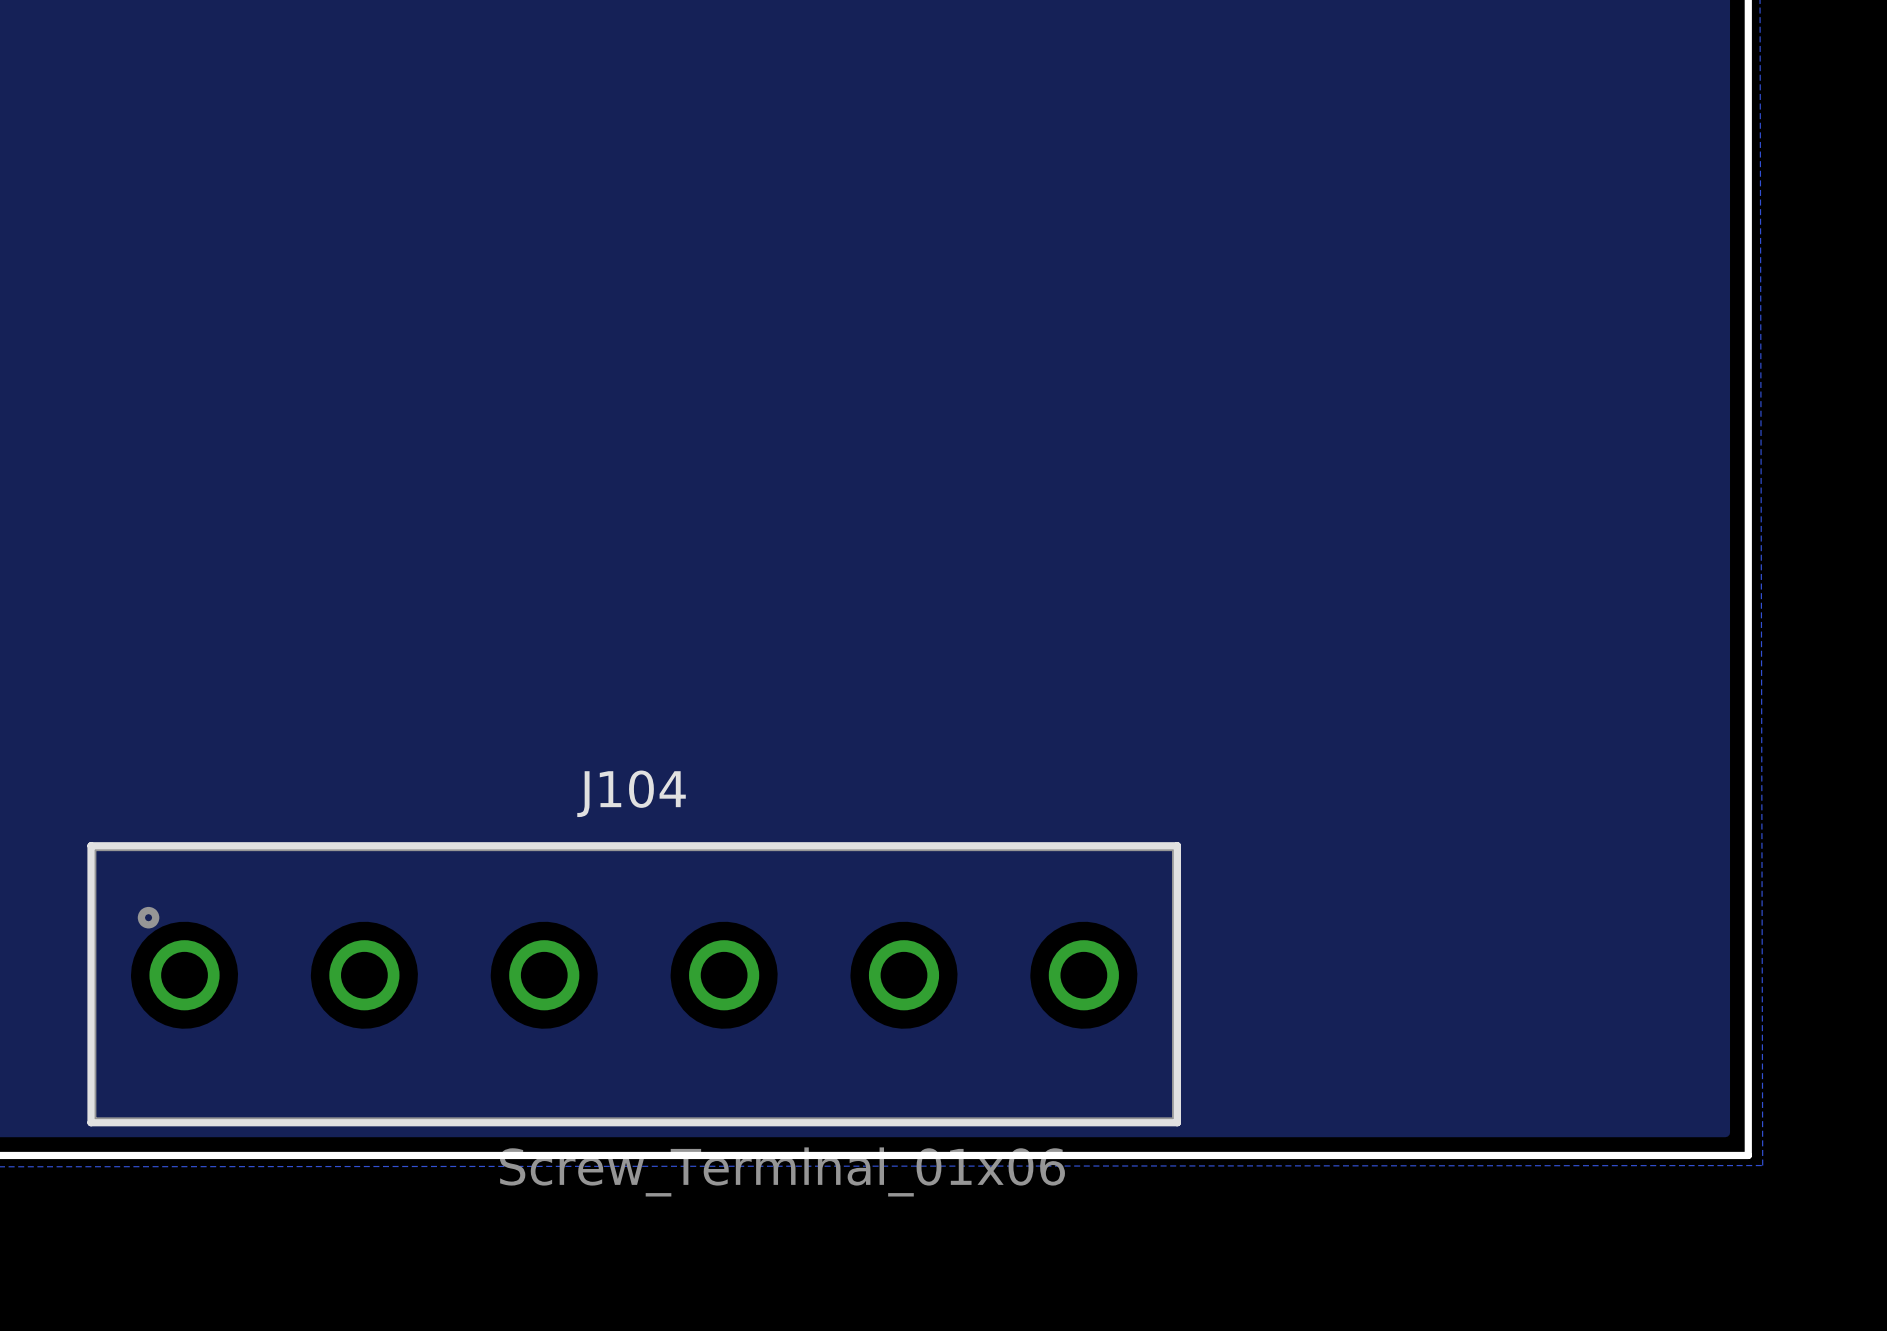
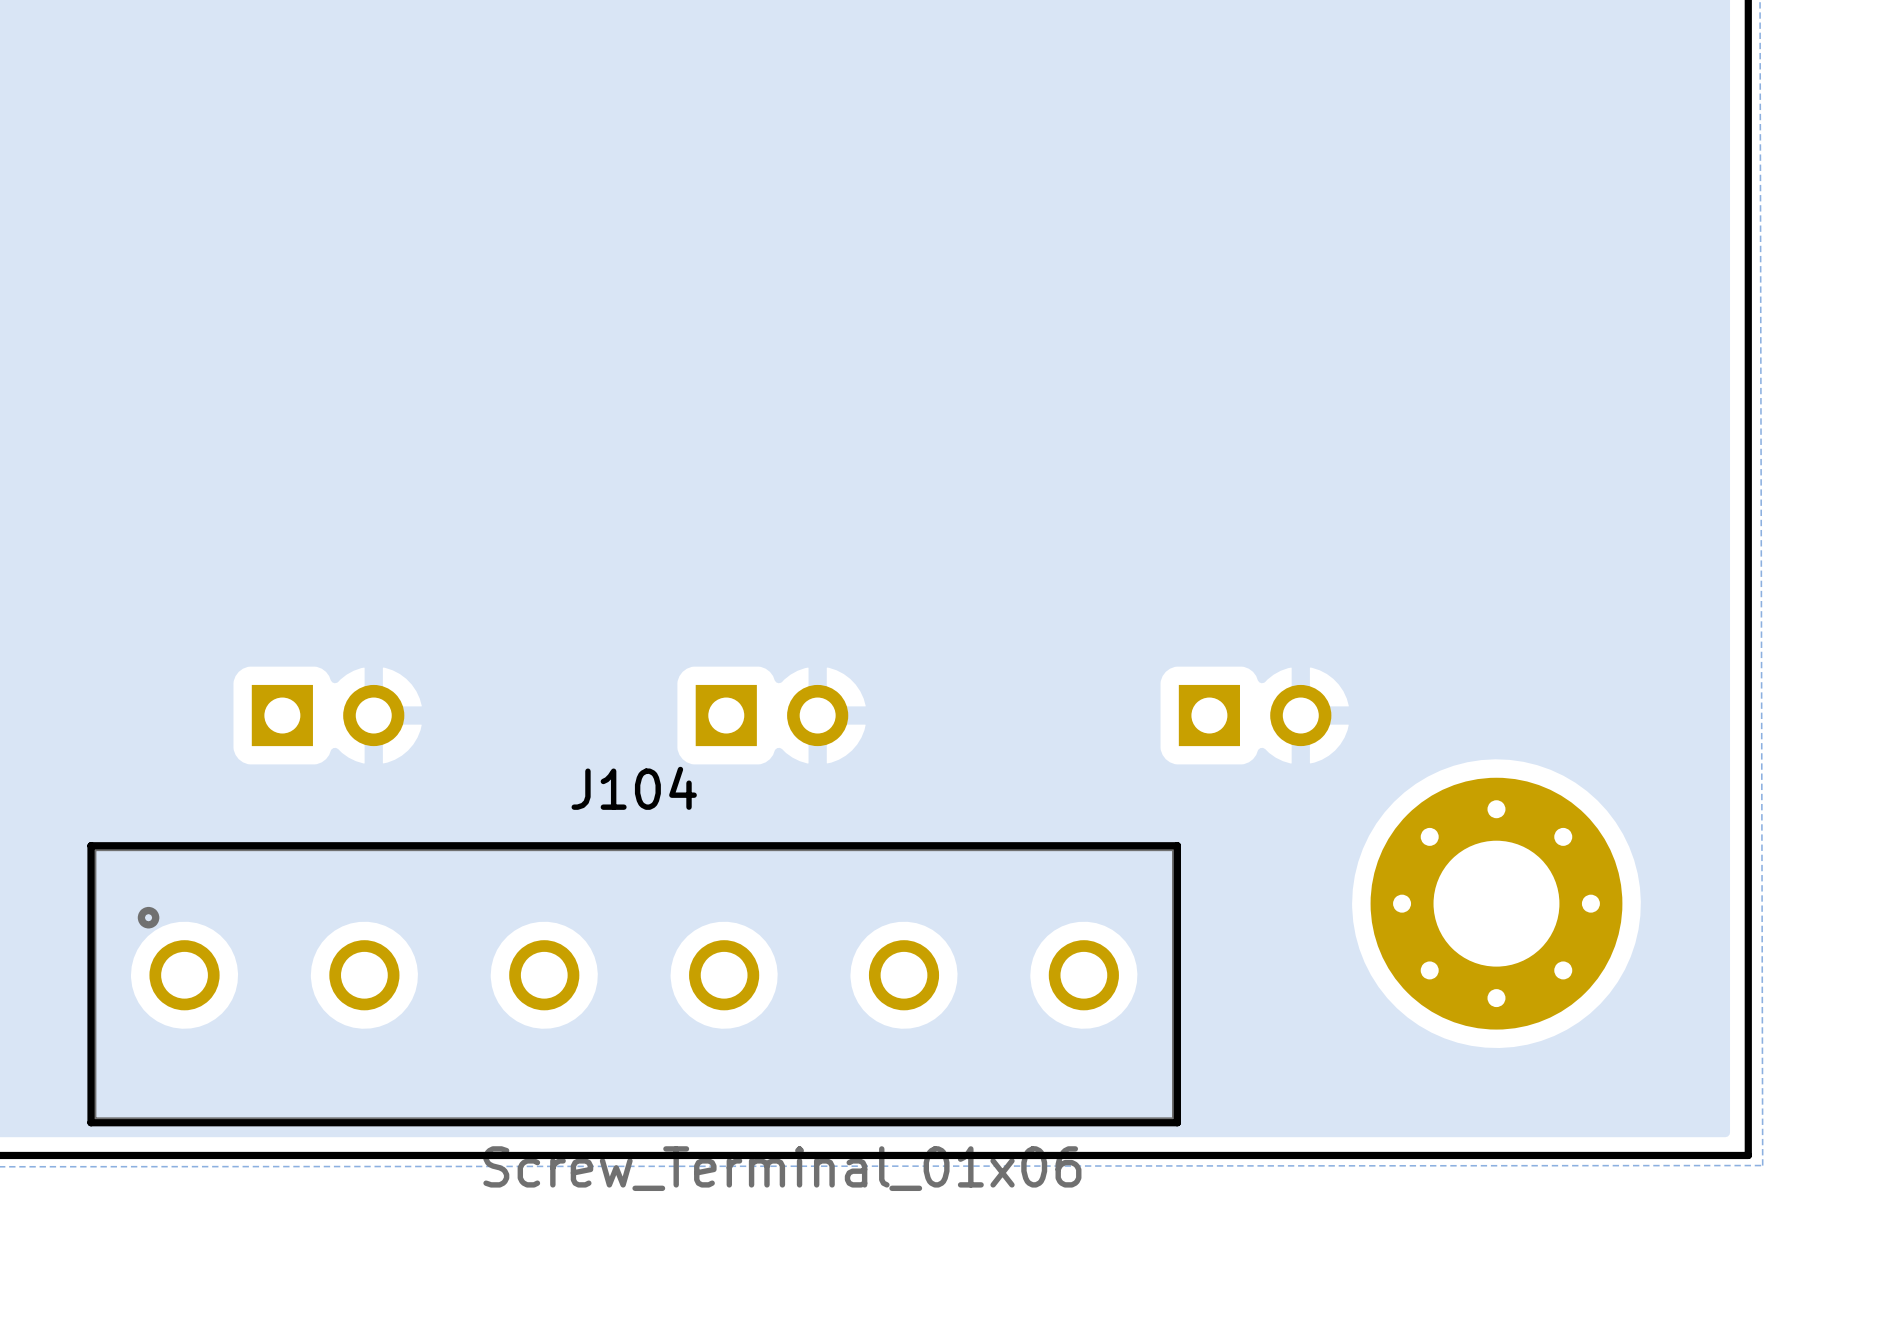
part: none -> (328, 715)
part: none -> (771, 715)
part: none -> (1255, 715)
part: none -> (1496, 903)

